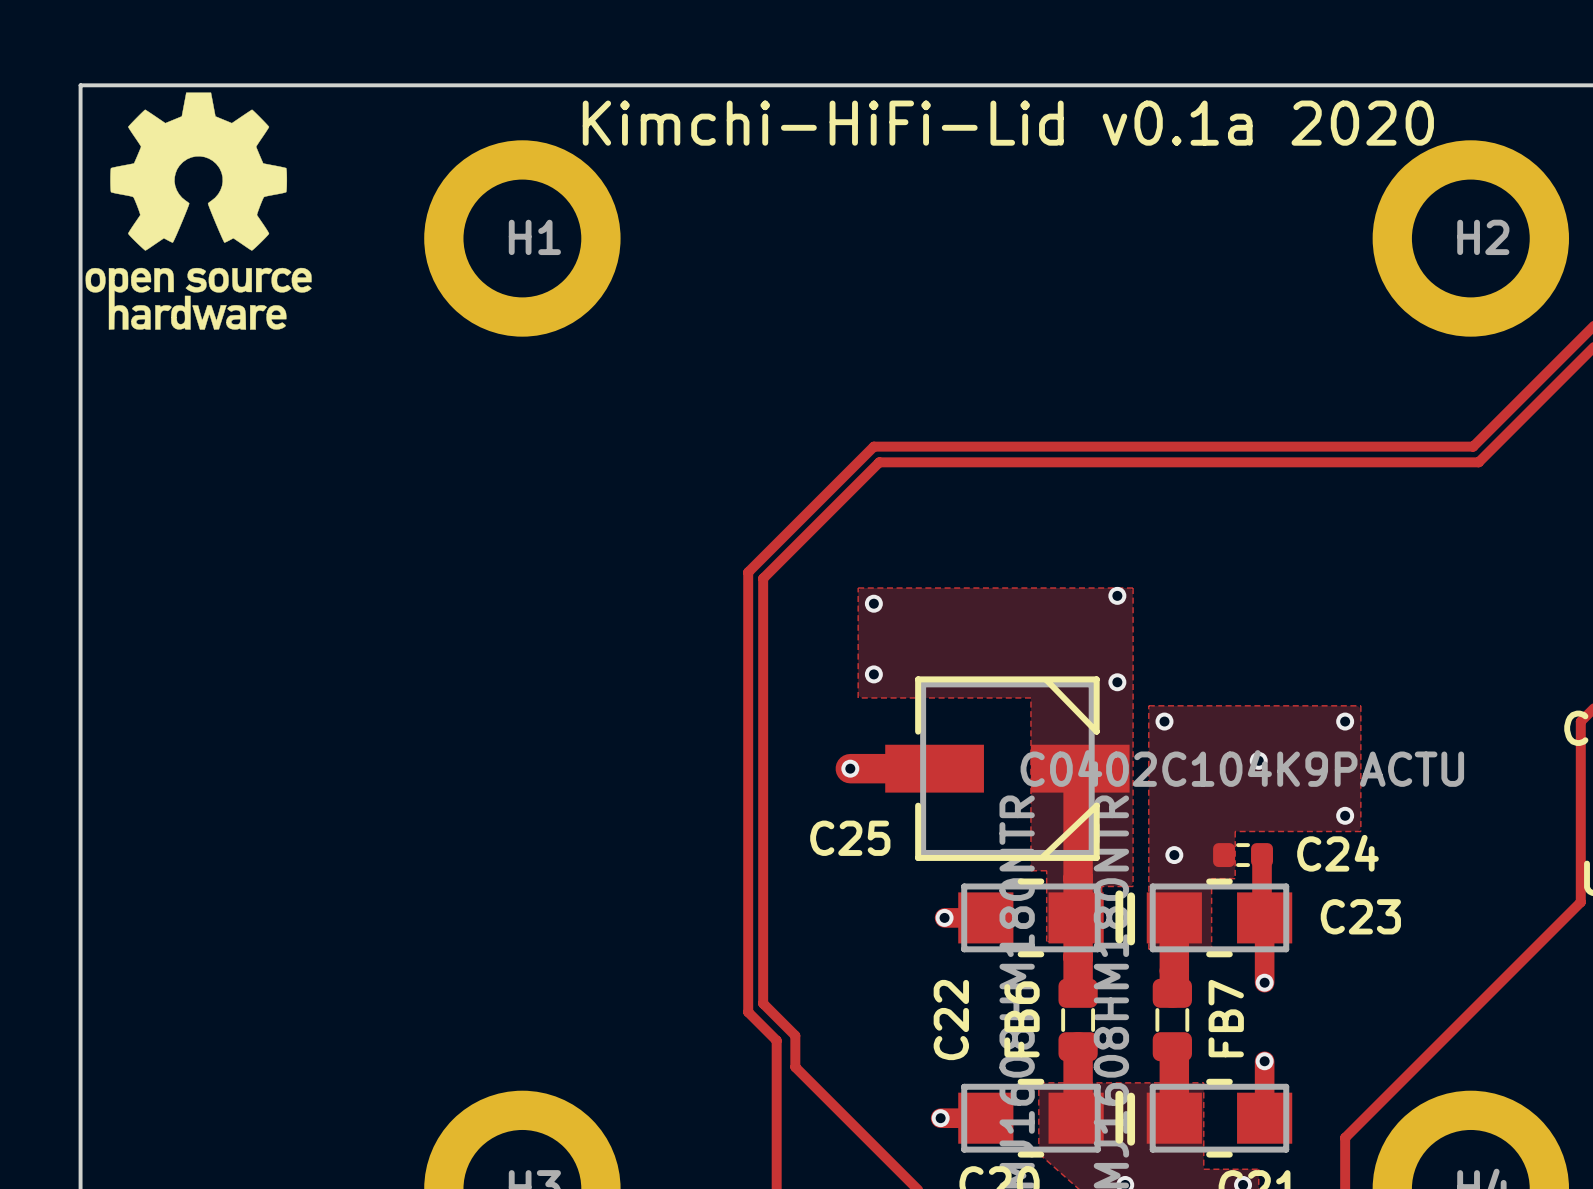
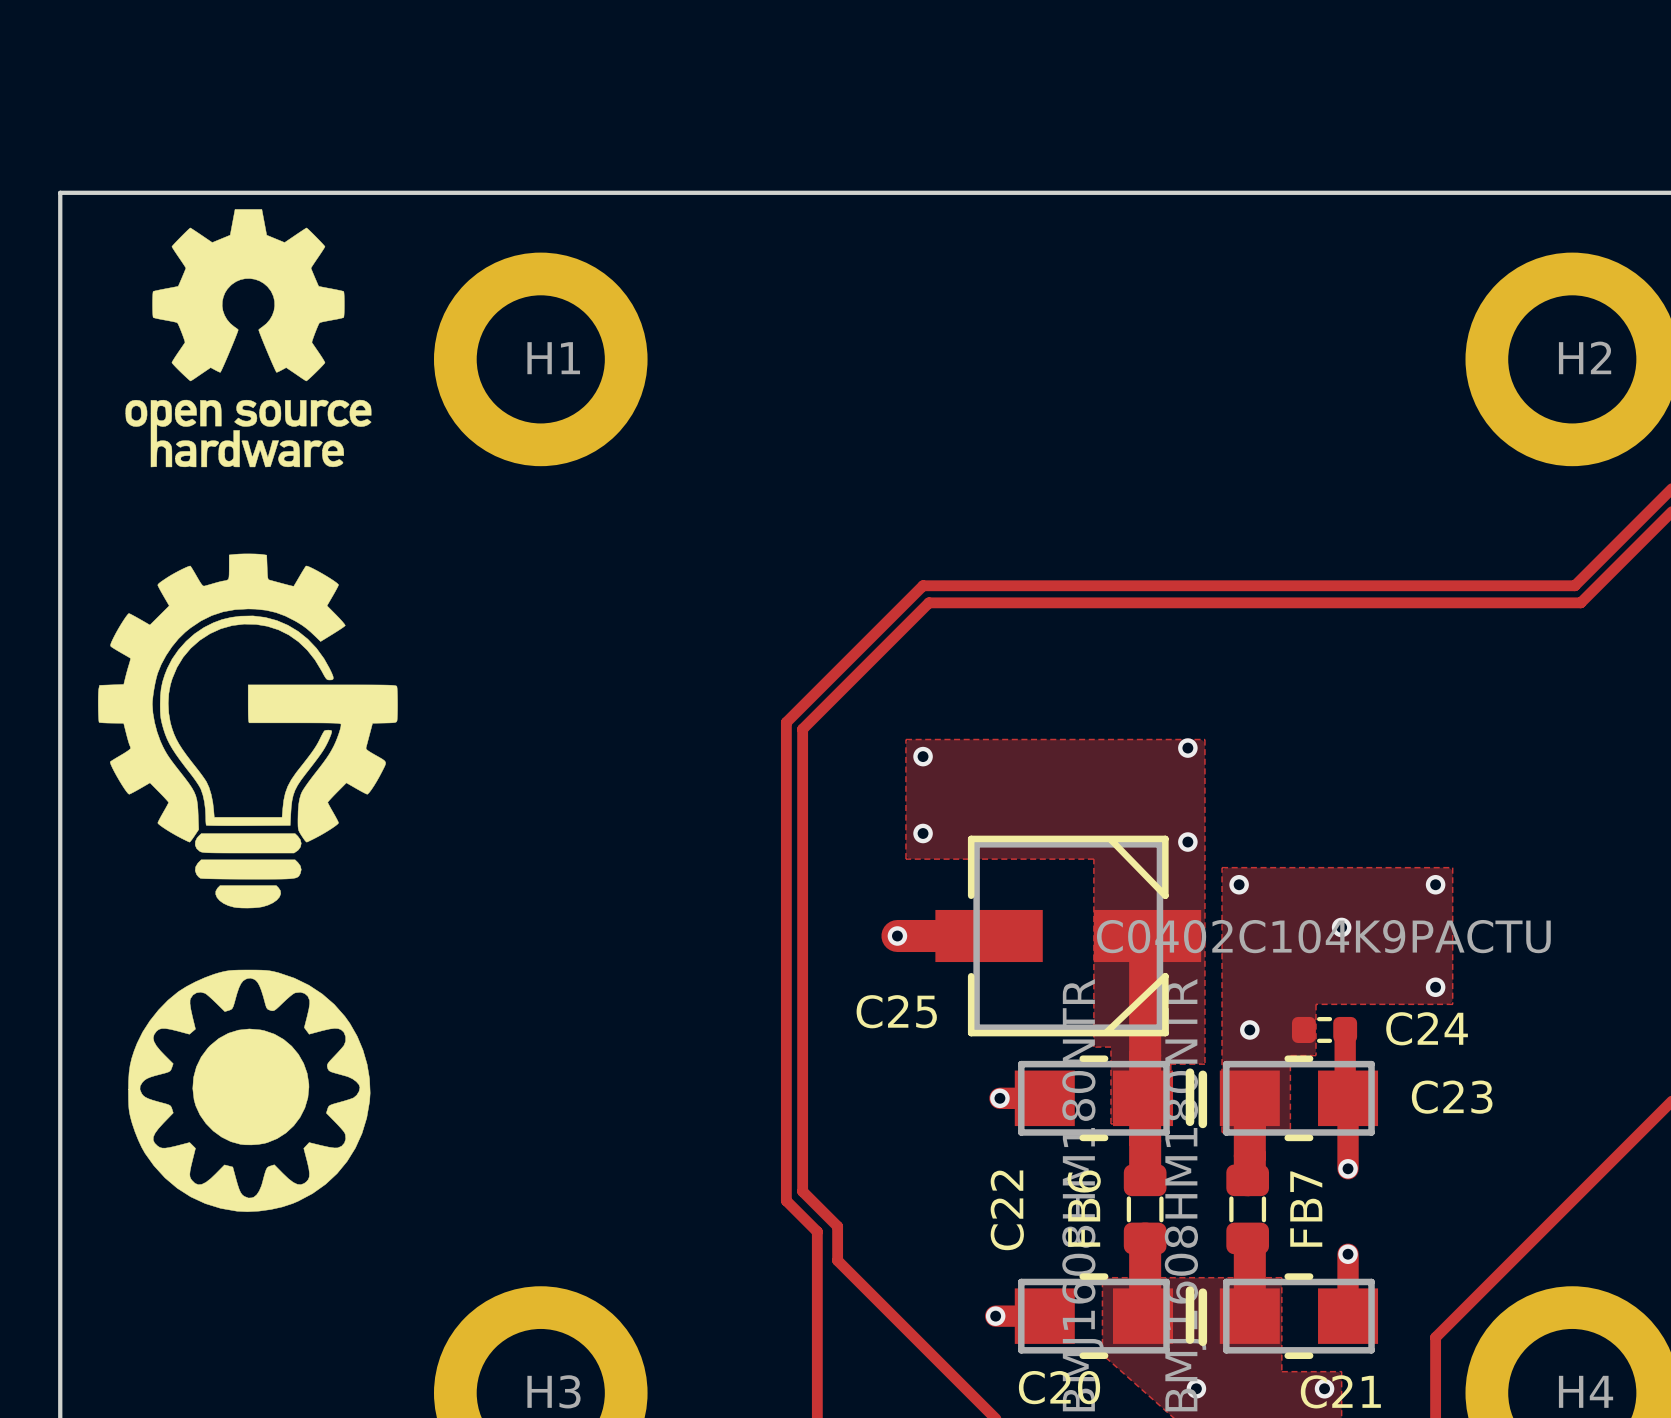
text: Kimchi-HiFi-Lid v0.1a 2020 (1008, 123) -> none
drawing position: (198, 211) -> (248, 338)
drawing: none -> [98, 553, 398, 909]
drawing: none -> [128, 969, 371, 1212]

